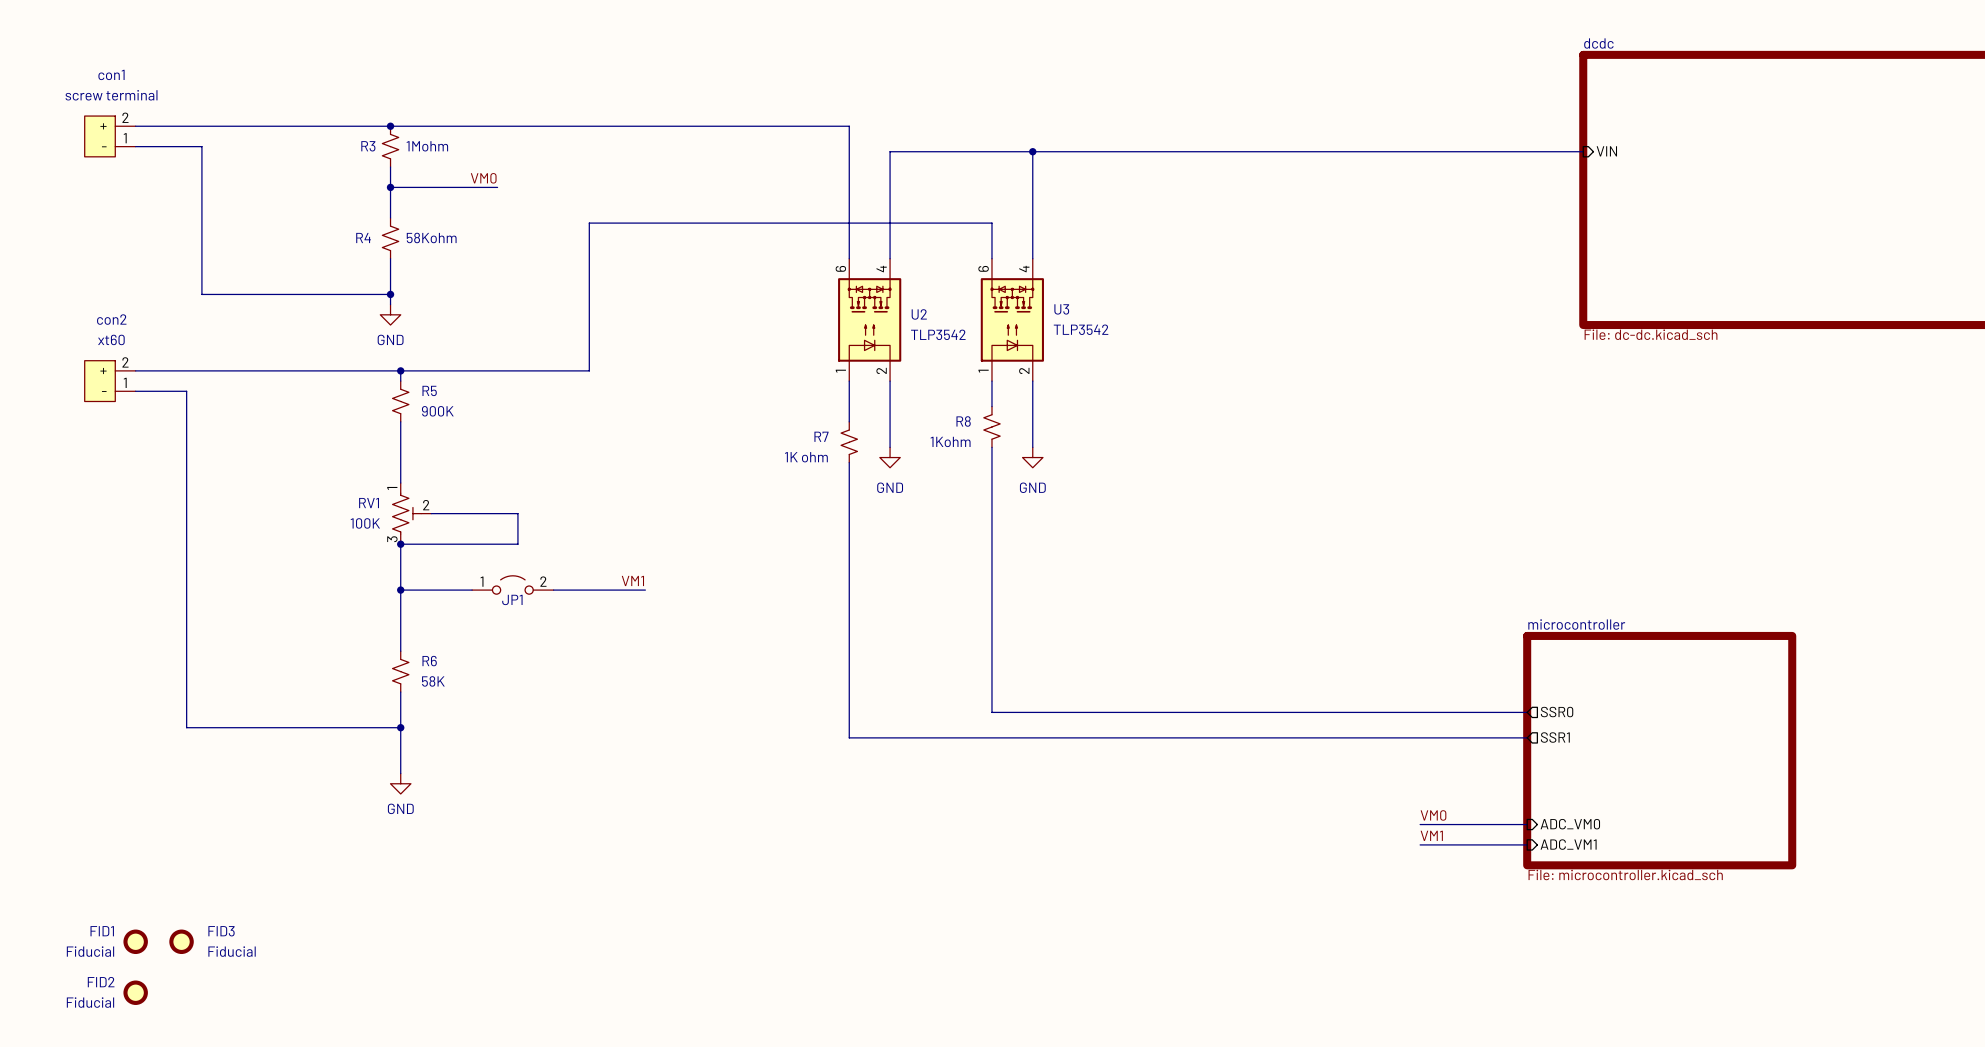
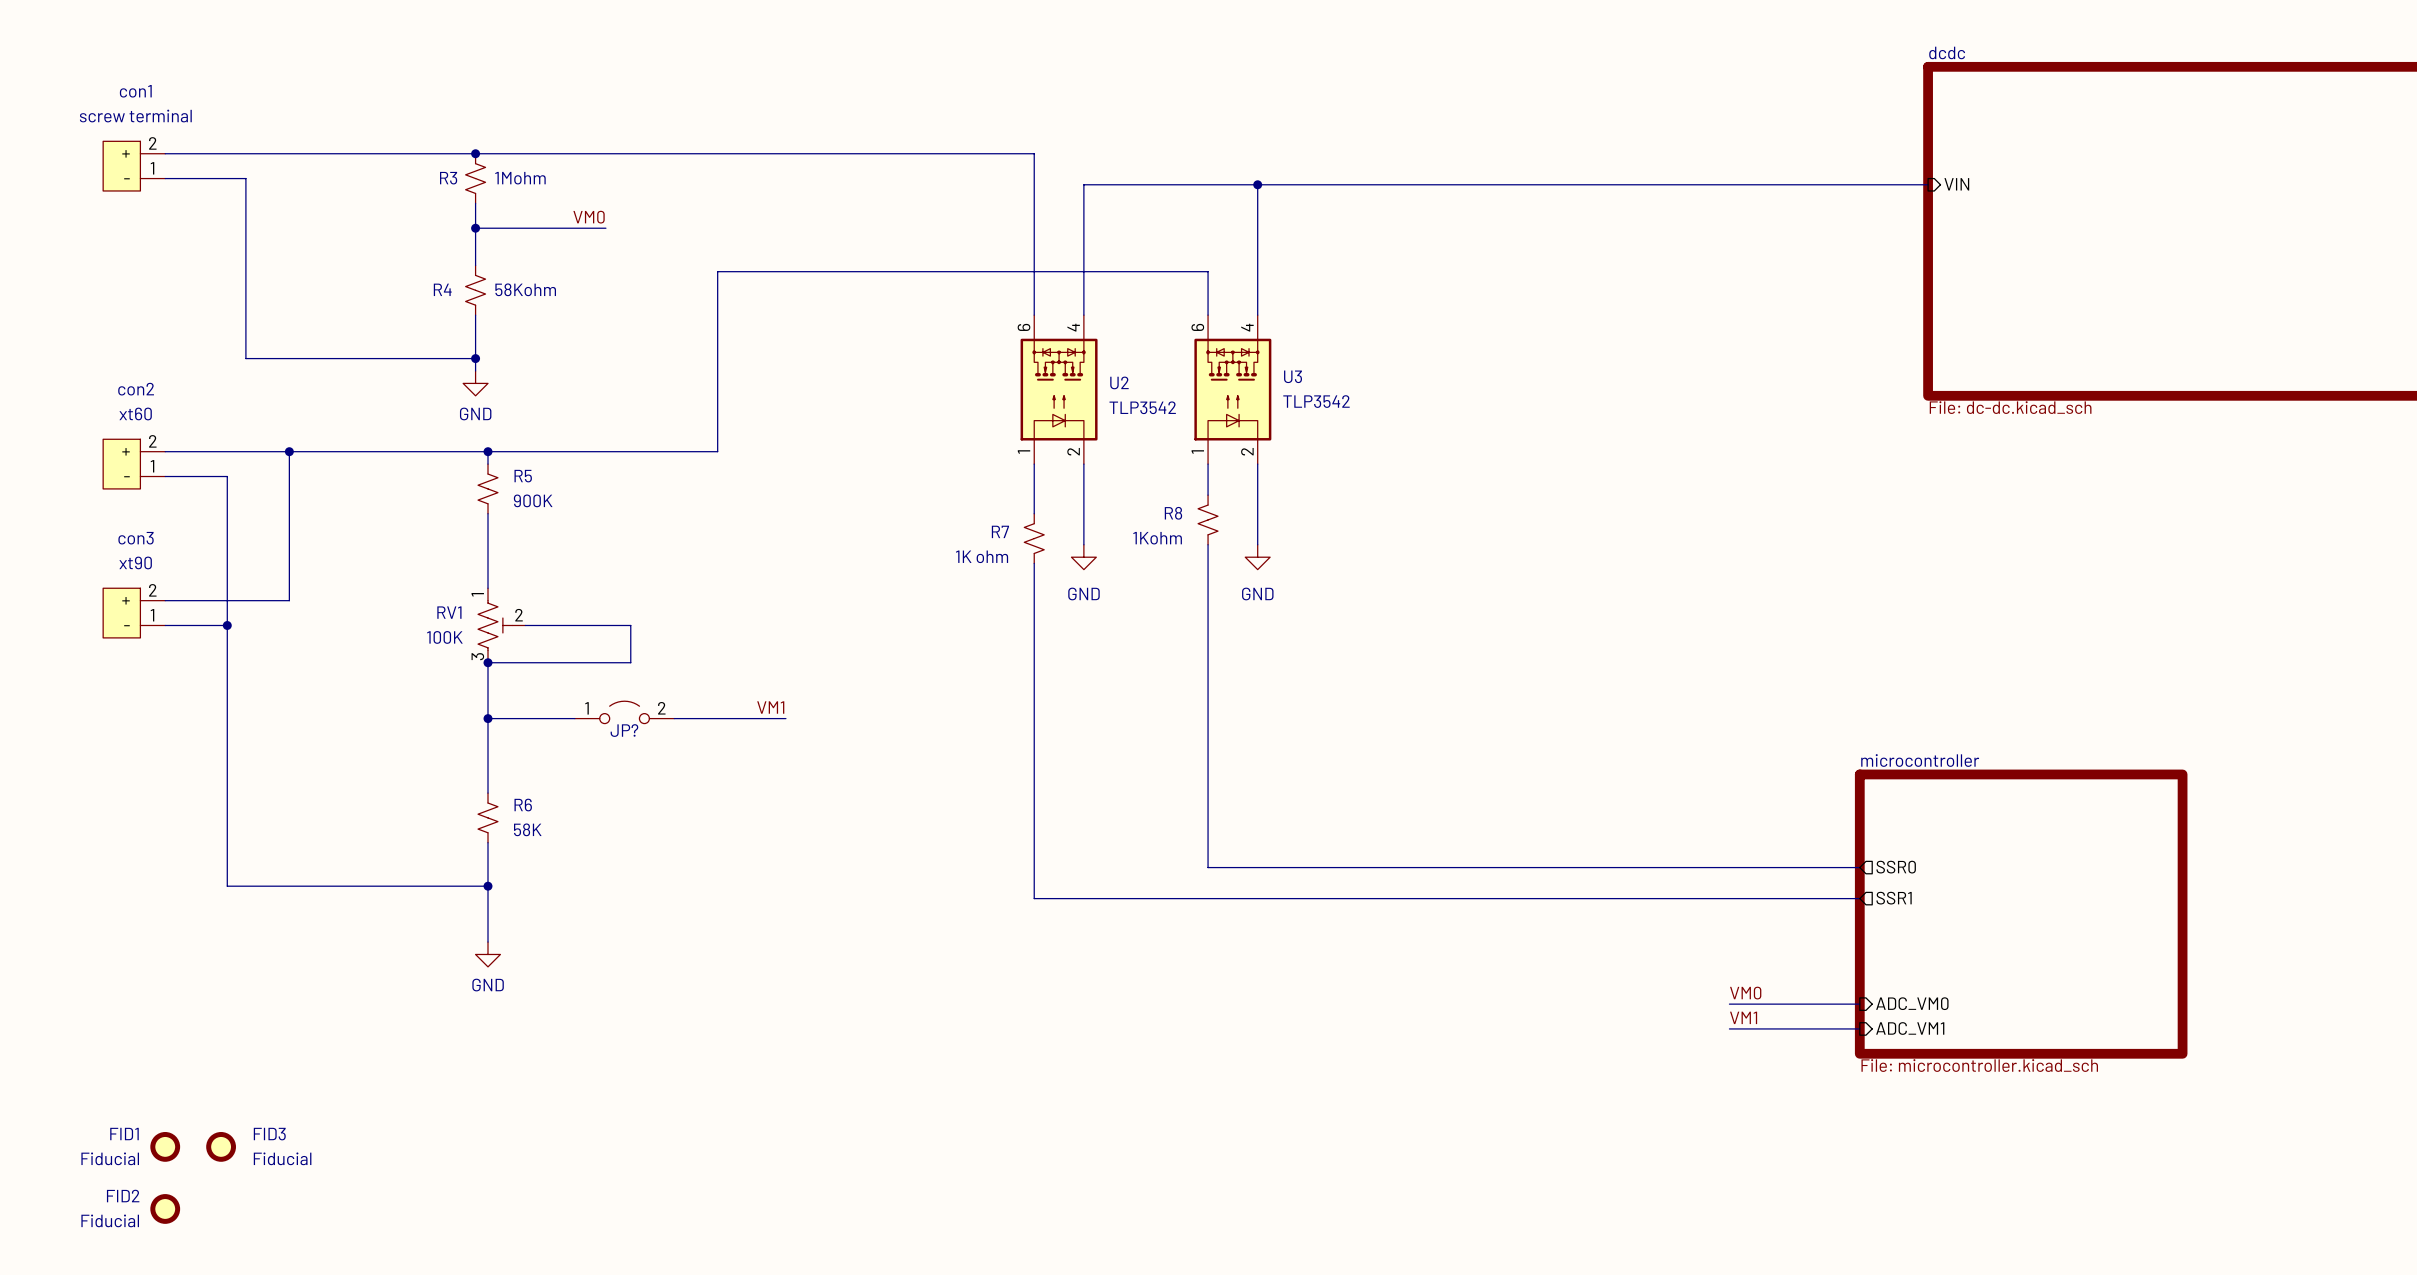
wire: none -> (289, 451) (289, 600) (165, 600)
junction: none -> (289, 451)
con3: none -> xt90 (134, 613)
wire: none -> (165, 625) (227, 625)
junction: none -> (227, 625)
JP1 name: JP1 (512, 599) -> JP? (624, 730)

